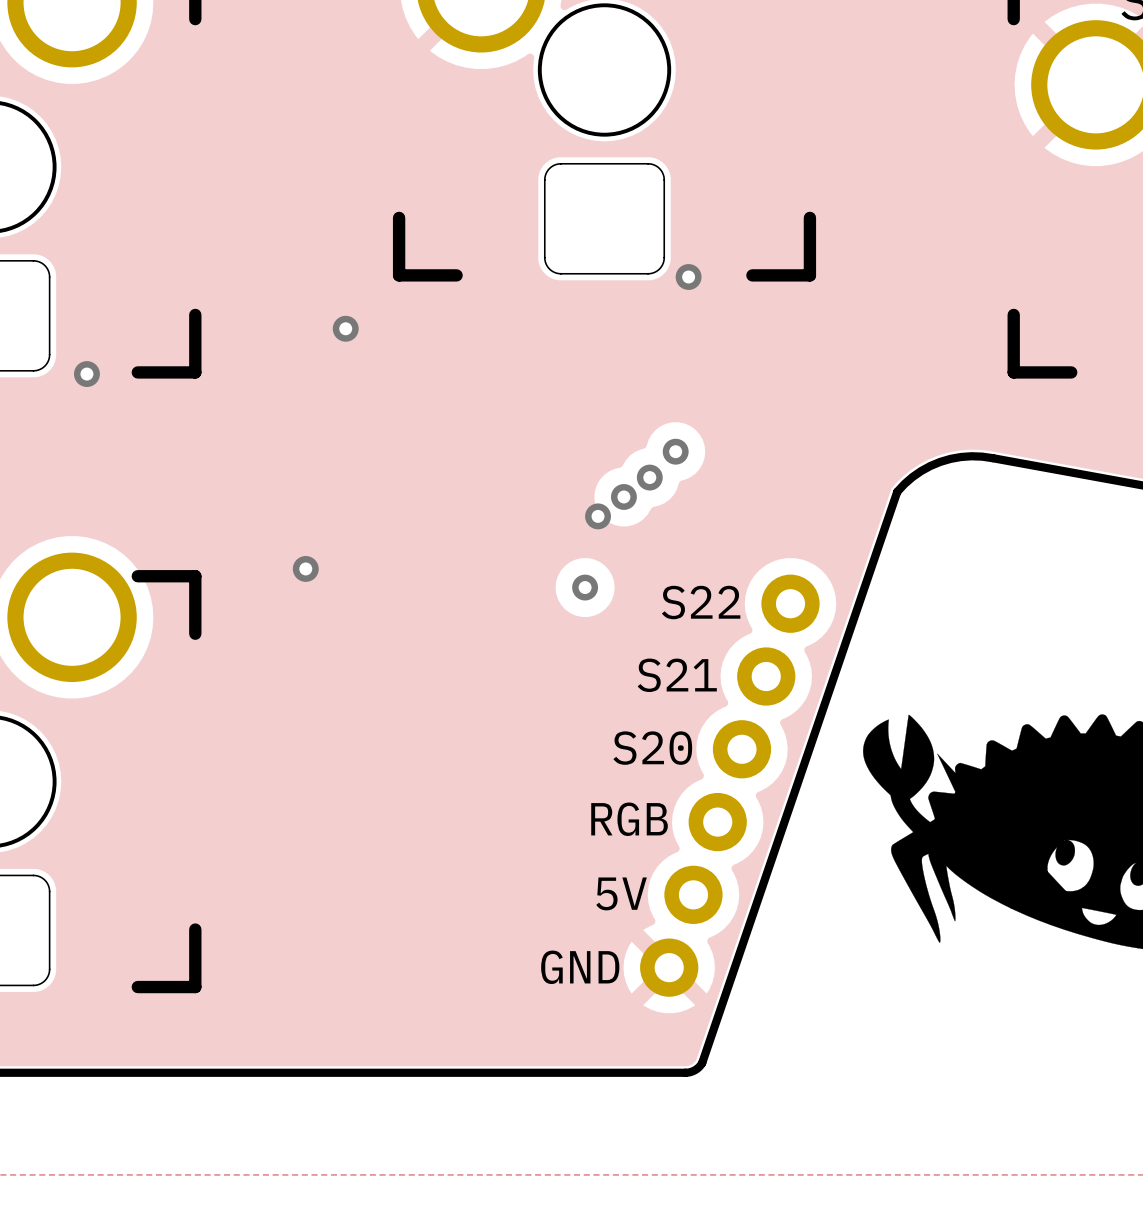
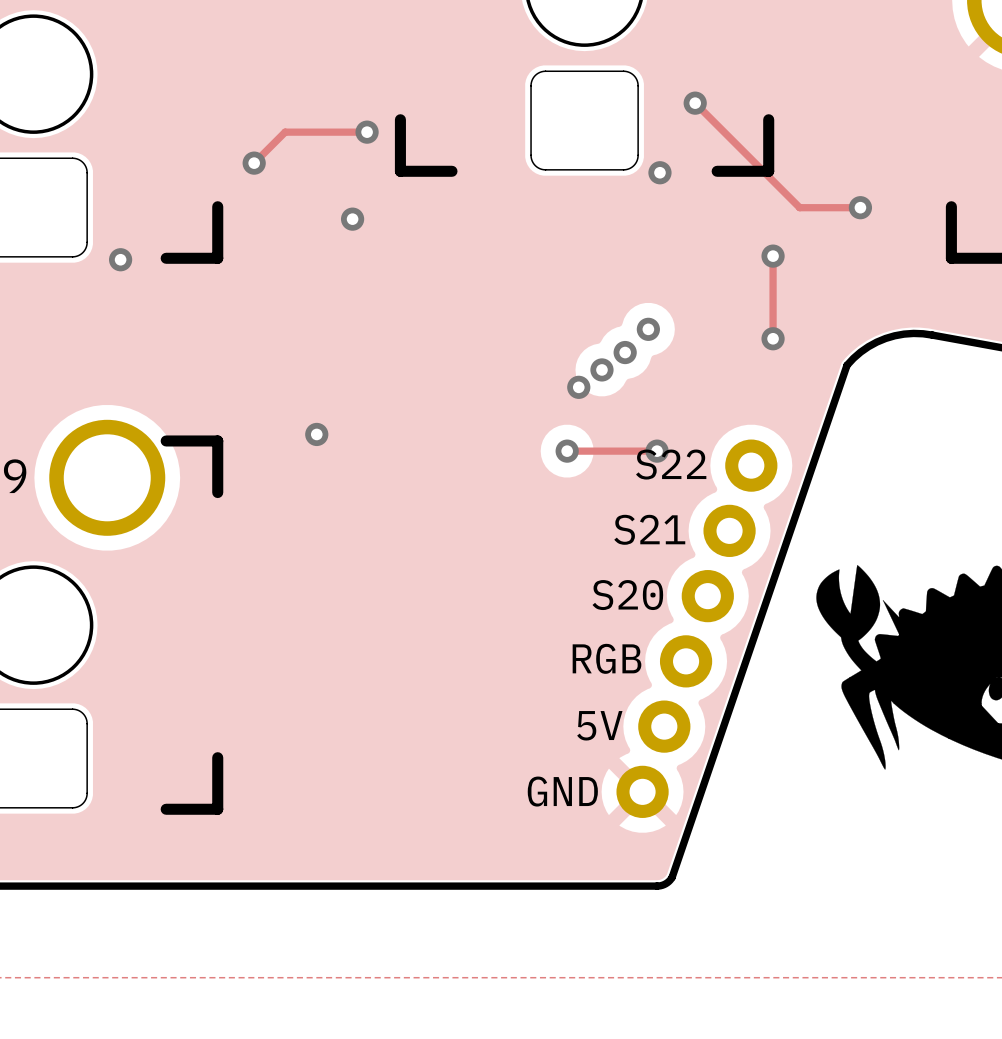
track: none -> (695, 103) (799, 207) (860, 207)
via: none -> (695, 103)
track: none -> (367, 132) (285, 132) (254, 163)
via: none -> (367, 132)
via: none -> (254, 163)
via: none -> (860, 207)
track: none -> (773, 256) (773, 338)
via: none -> (773, 256)
via: none -> (773, 338)
track: none -> (567, 451) (657, 451)
via: none -> (657, 451)

